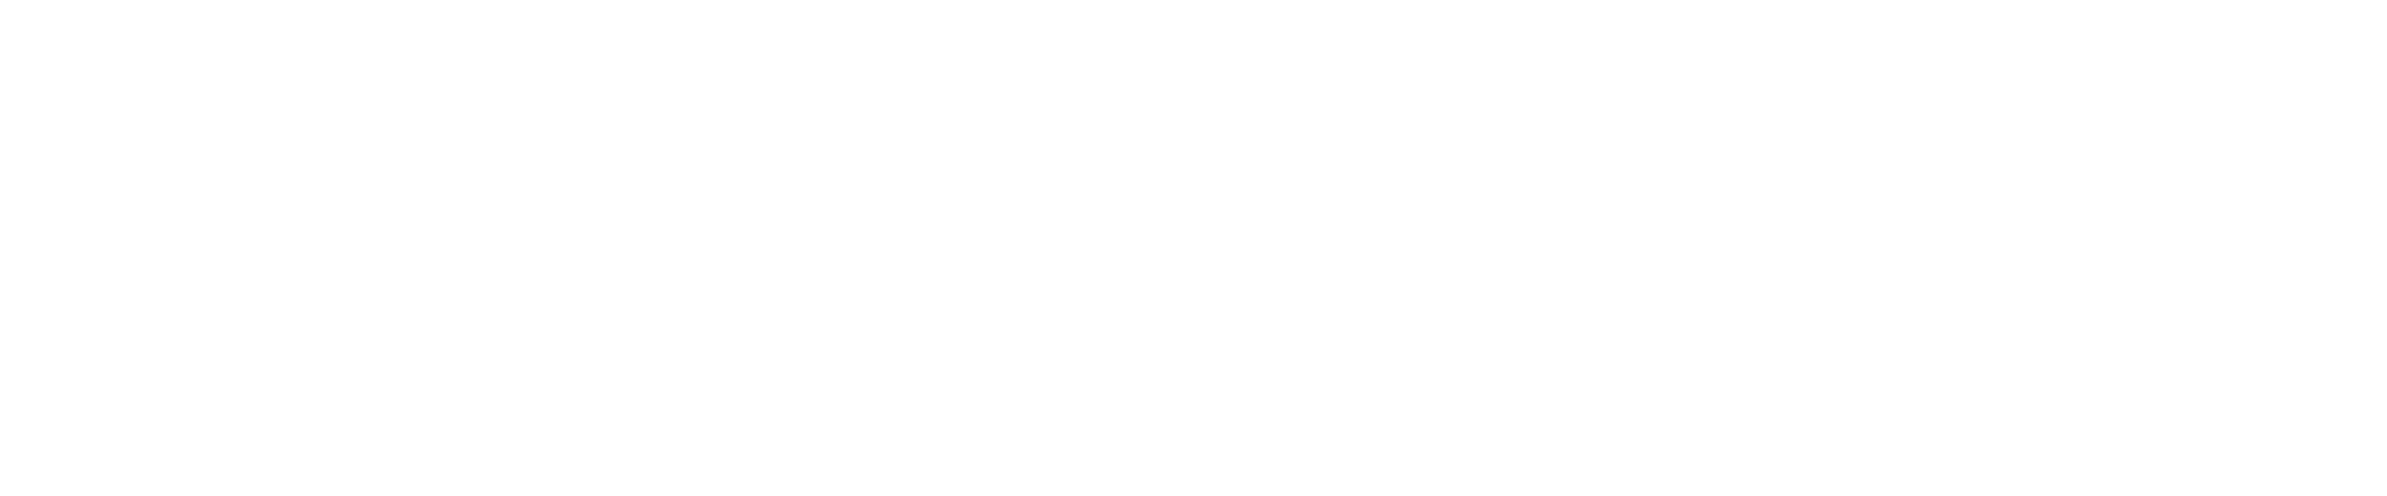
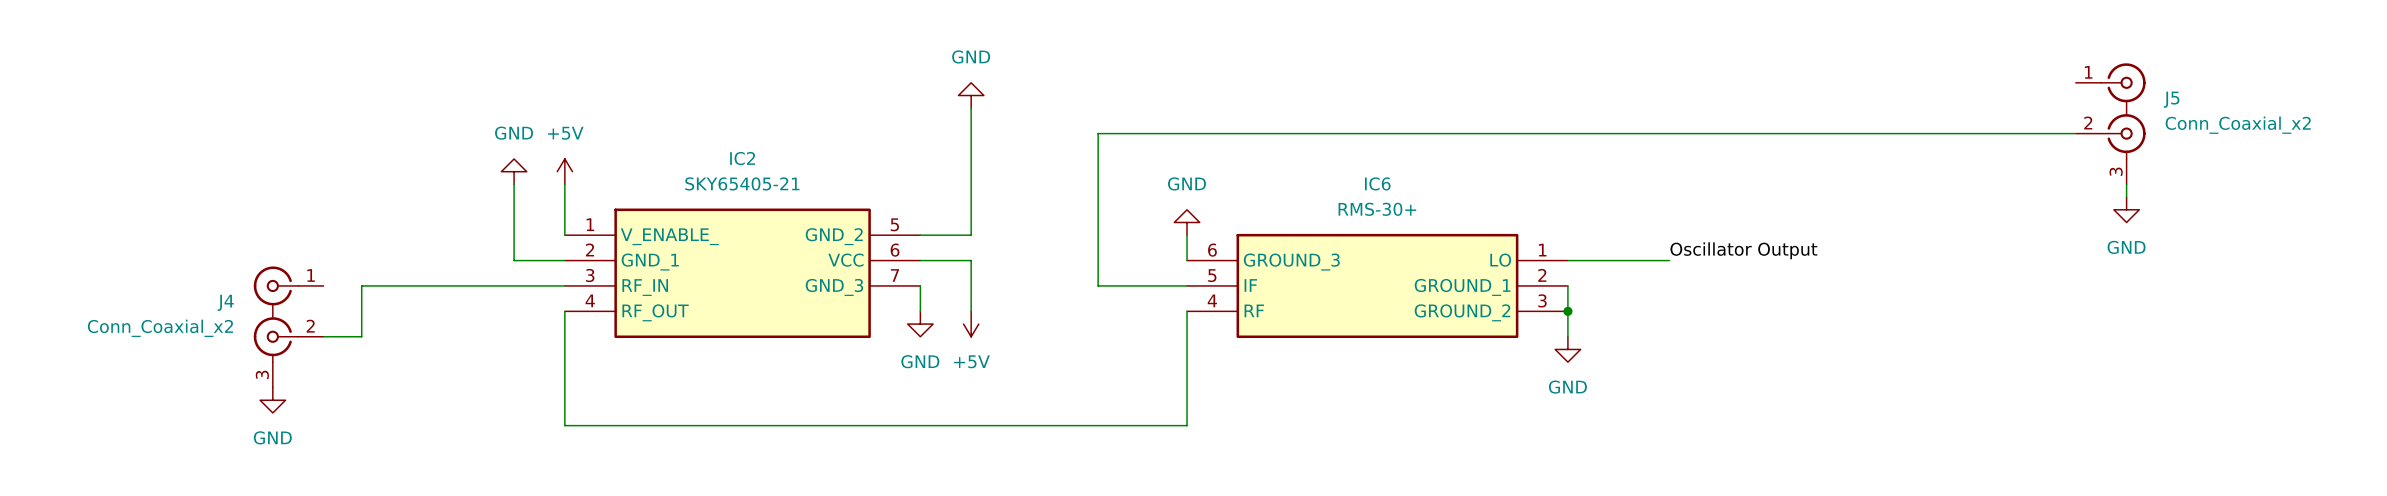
power symbol: none -> GND (971, 95)
wire: none -> (971, 108) (971, 235) (920, 235)
J5: none -> Conn_Coaxial_x2 (2110, 123)
wire: none -> (2075, 133) (1098, 133) (1098, 285) (1187, 285)
power symbol: none -> GND (514, 171)
power symbol: none -> +5V (564, 171)
wire: none -> (514, 184) (514, 260) (564, 260)
wire: none -> (564, 184) (564, 235)
wire: none -> (2126, 184) (2126, 197)
power symbol: none -> GND (2126, 209)
power symbol: none -> GND (1187, 222)
wire: none -> (1187, 235) (1187, 260)
label: none -> Oscillator Output (1743, 250)
wire: none -> (920, 260) (971, 260) (971, 311)
wire: none -> (1567, 260) (1669, 260)
IC2: none -> SKY65405-21 (742, 273)
wire: none -> (564, 285) (361, 285) (361, 336) (323, 336)
wire: none -> (920, 285) (920, 311)
IC6: none -> RMS-30+ (1377, 285)
wire: none -> (1567, 285) (1567, 336)
wire: none -> (564, 311) (564, 425) (1187, 425) (1187, 311)
junction: none -> (1567, 311)
power symbol: none -> GND (920, 324)
power symbol: none -> +5V (971, 324)
J4: none -> Conn_Coaxial_x2 (288, 326)
power symbol: none -> GND (1567, 349)
power symbol: none -> GND (272, 400)

